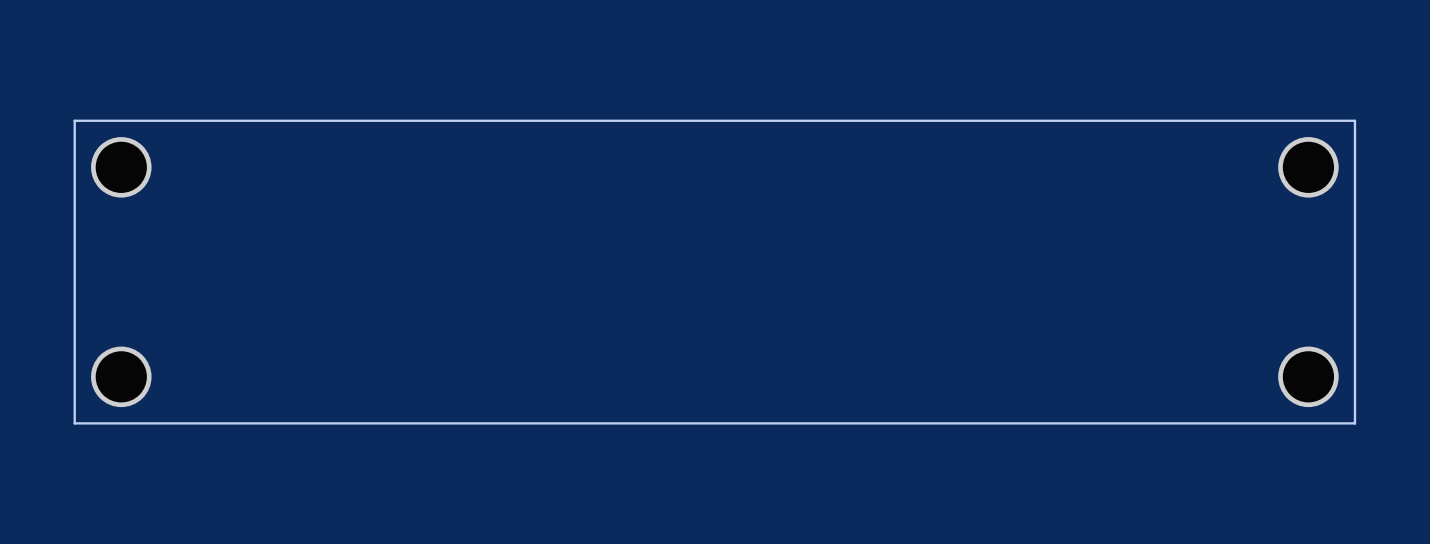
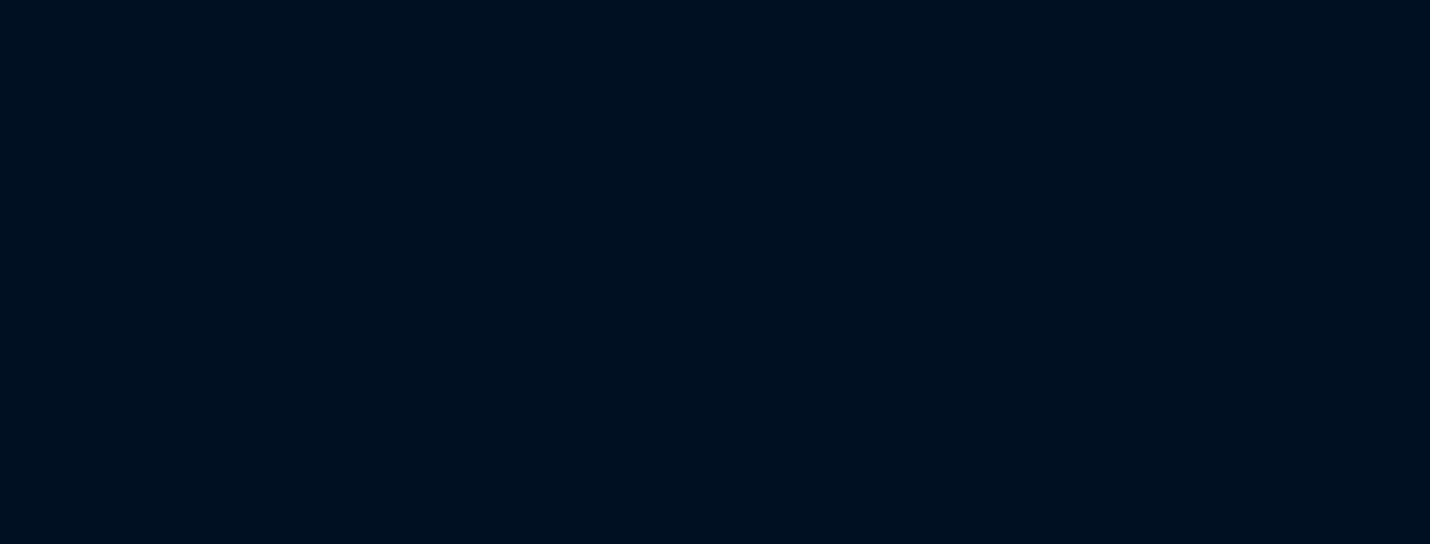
board edge: (1354, 120) (74, 120) (74, 423) (1354, 423) (1354, 120) -> none
part: (121, 167) -> none
part: (1308, 167) -> none
part: (121, 376) -> none
part: (1308, 376) -> none

